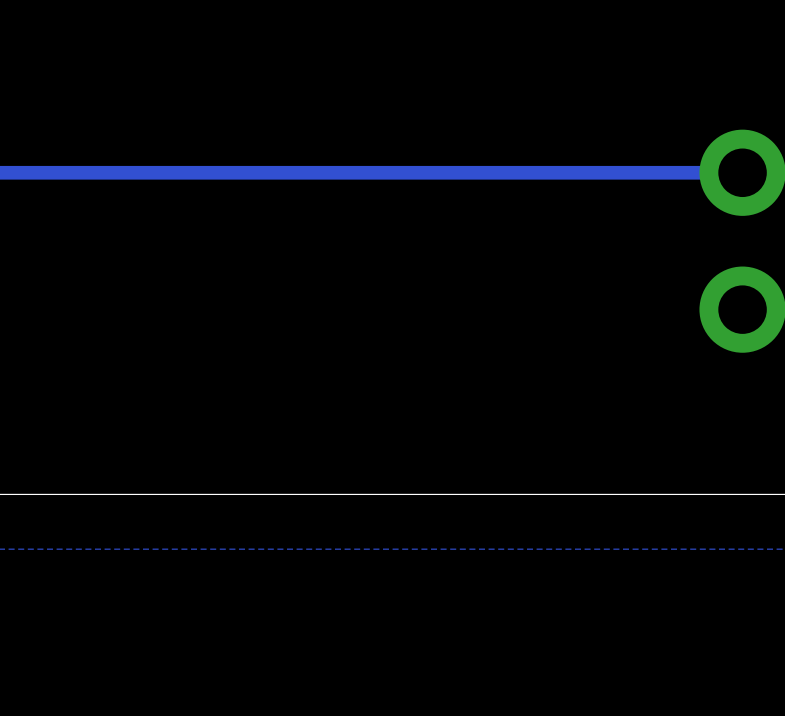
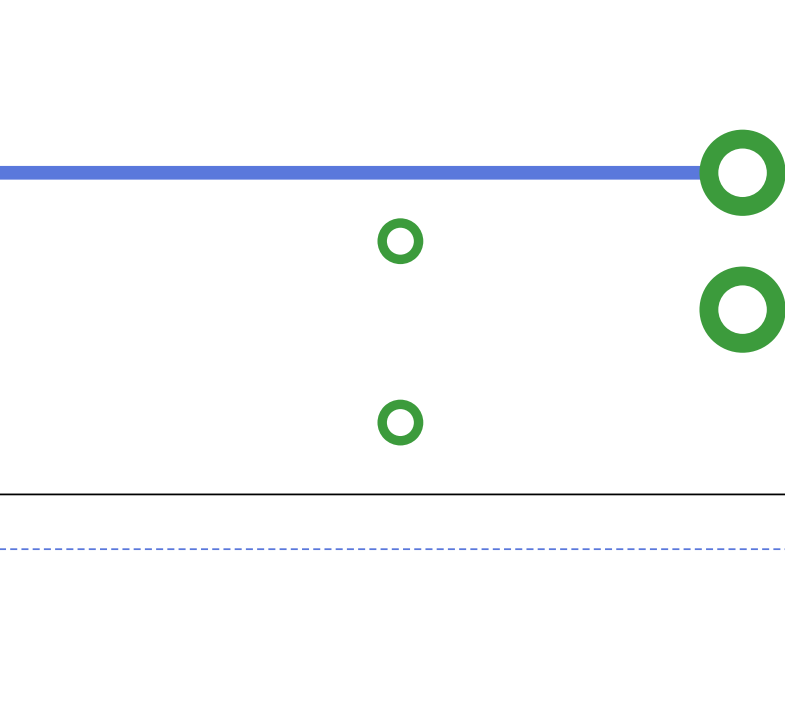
via: none -> (400, 241)
via: none -> (400, 422)

